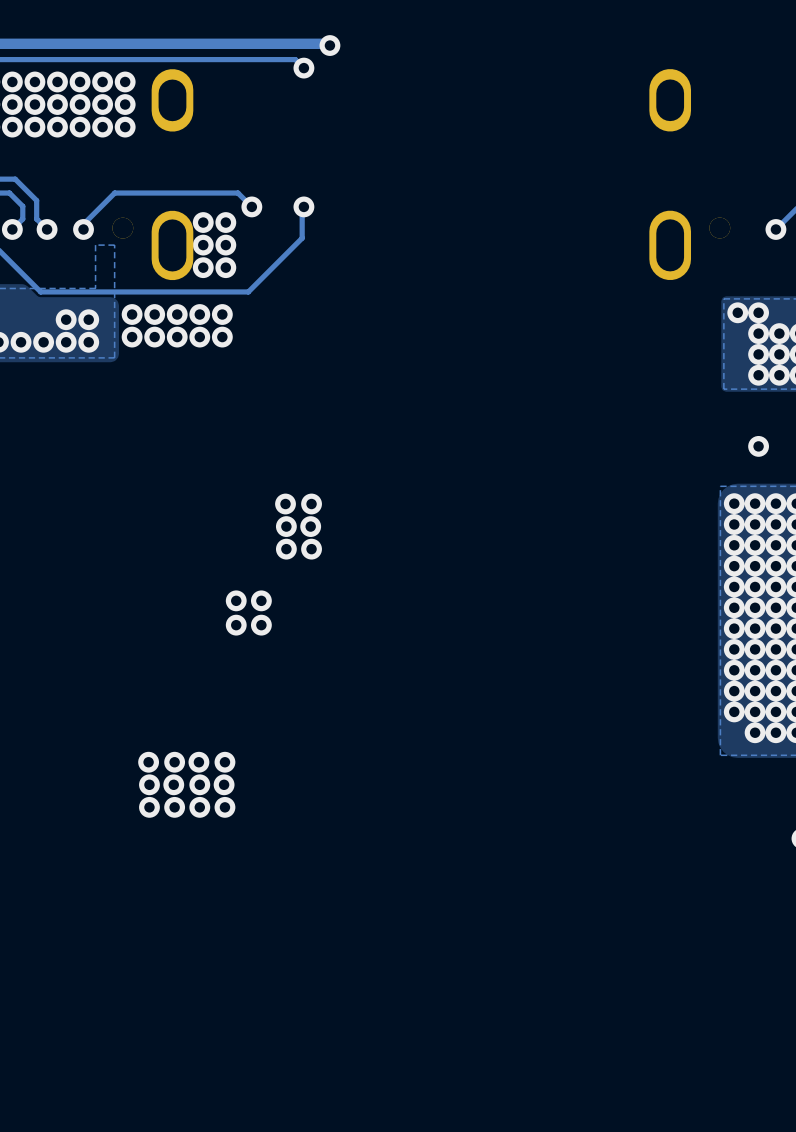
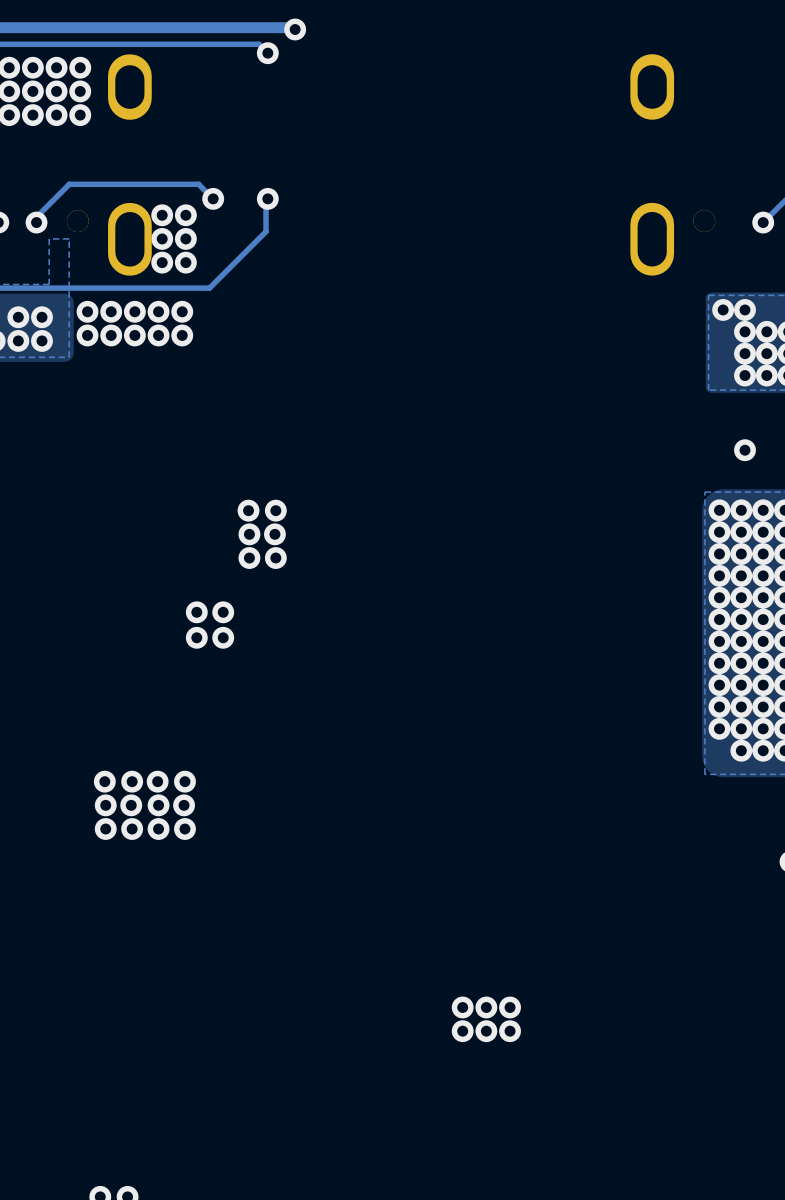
via: none -> (462, 1007)
via: none -> (486, 1007)
via: none -> (510, 1007)
via: none -> (462, 1031)
via: none -> (486, 1031)
via: none -> (510, 1031)

